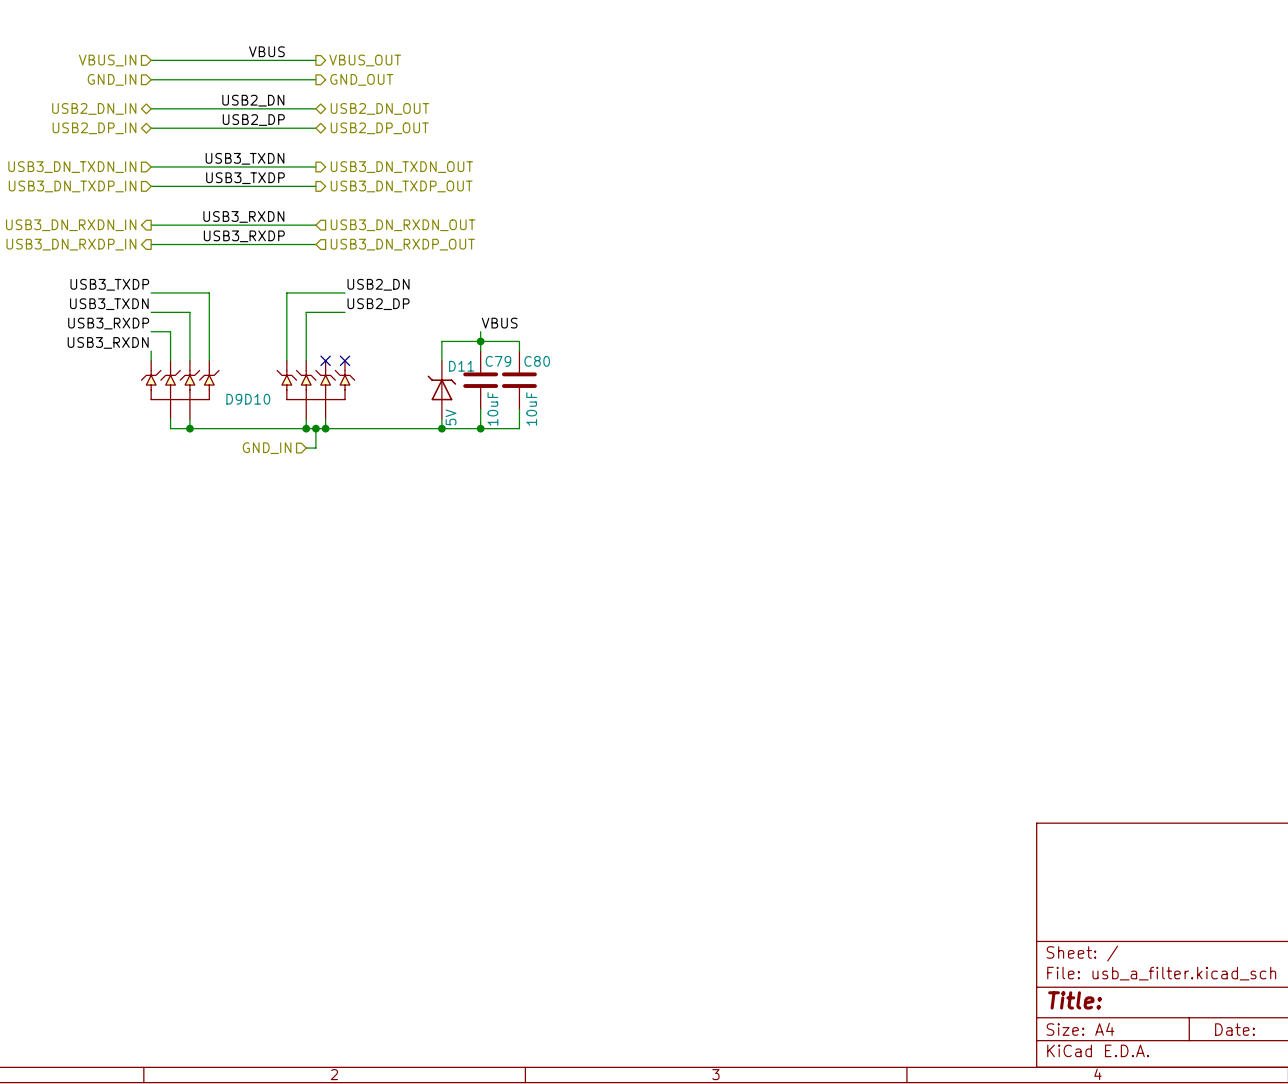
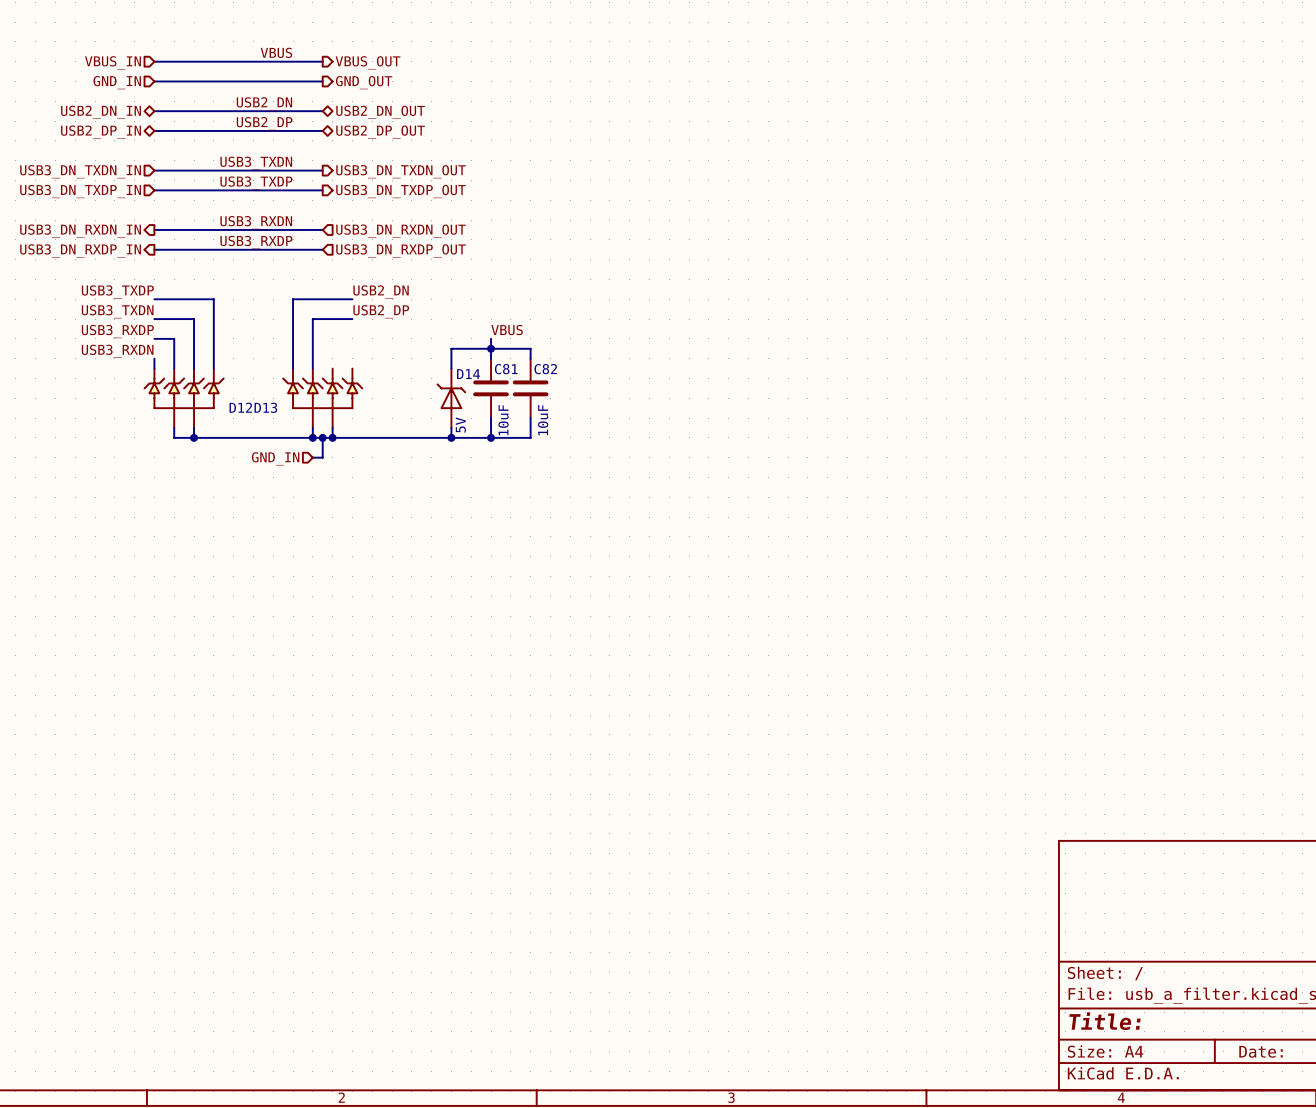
no-connect mark: (325, 360) -> none
no-connect mark: (344, 360) -> none
C79 name: C79 (498, 361) -> C81 (506, 369)
C80 name: C80 (537, 361) -> C82 (545, 369)
D11 name: D11 (461, 366) -> D14 (468, 374)
D9 name: D9 (234, 399) -> D12 (240, 407)
D10 name: D10 (257, 399) -> D13 (265, 407)

